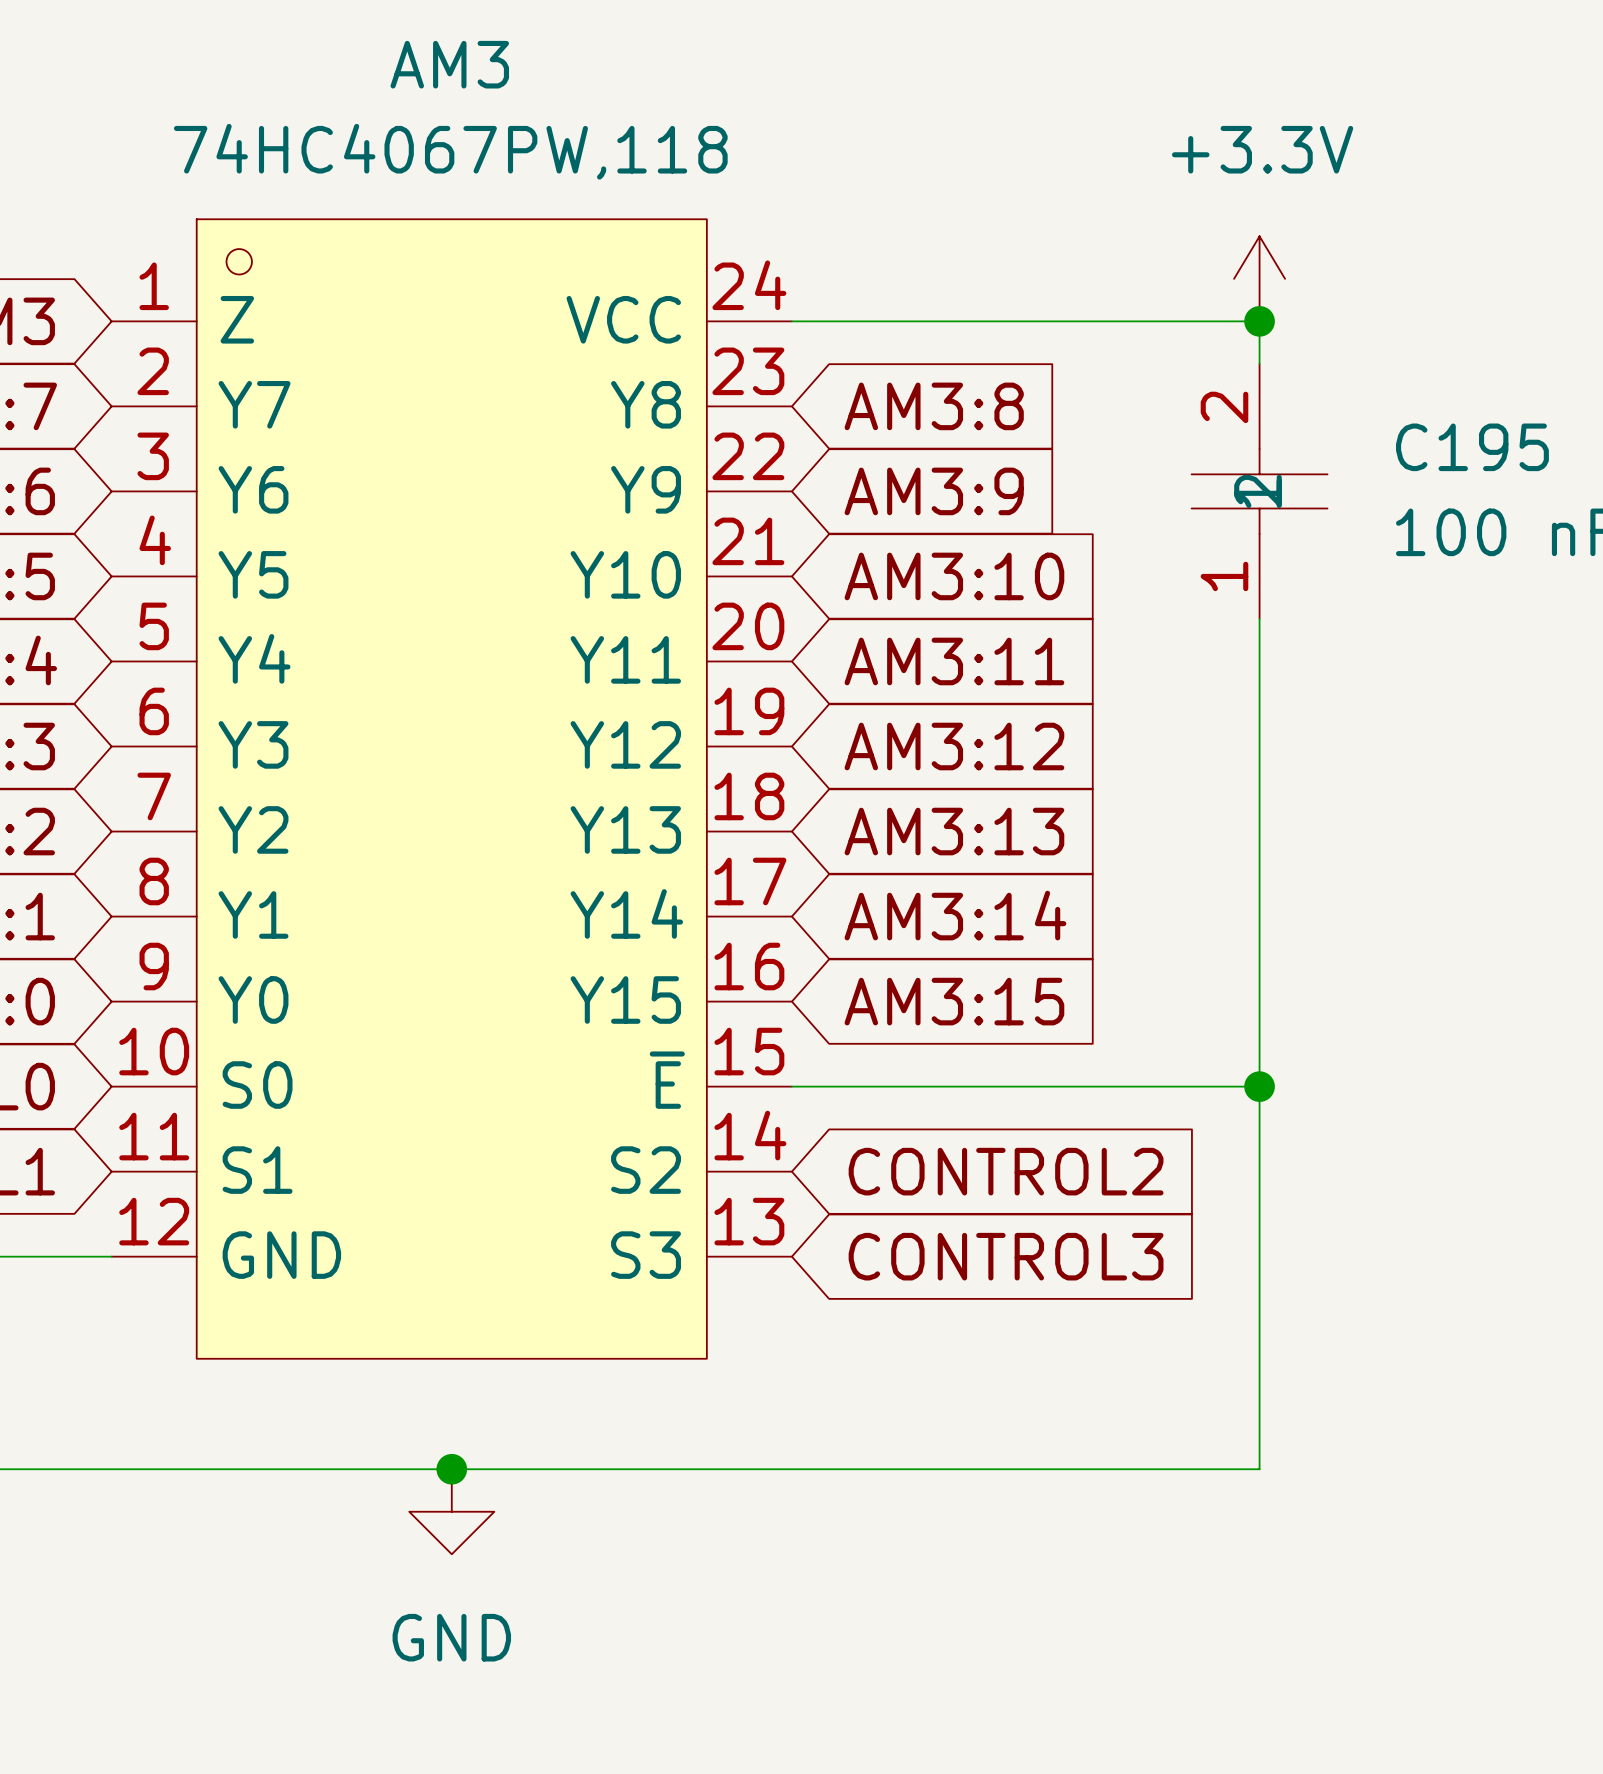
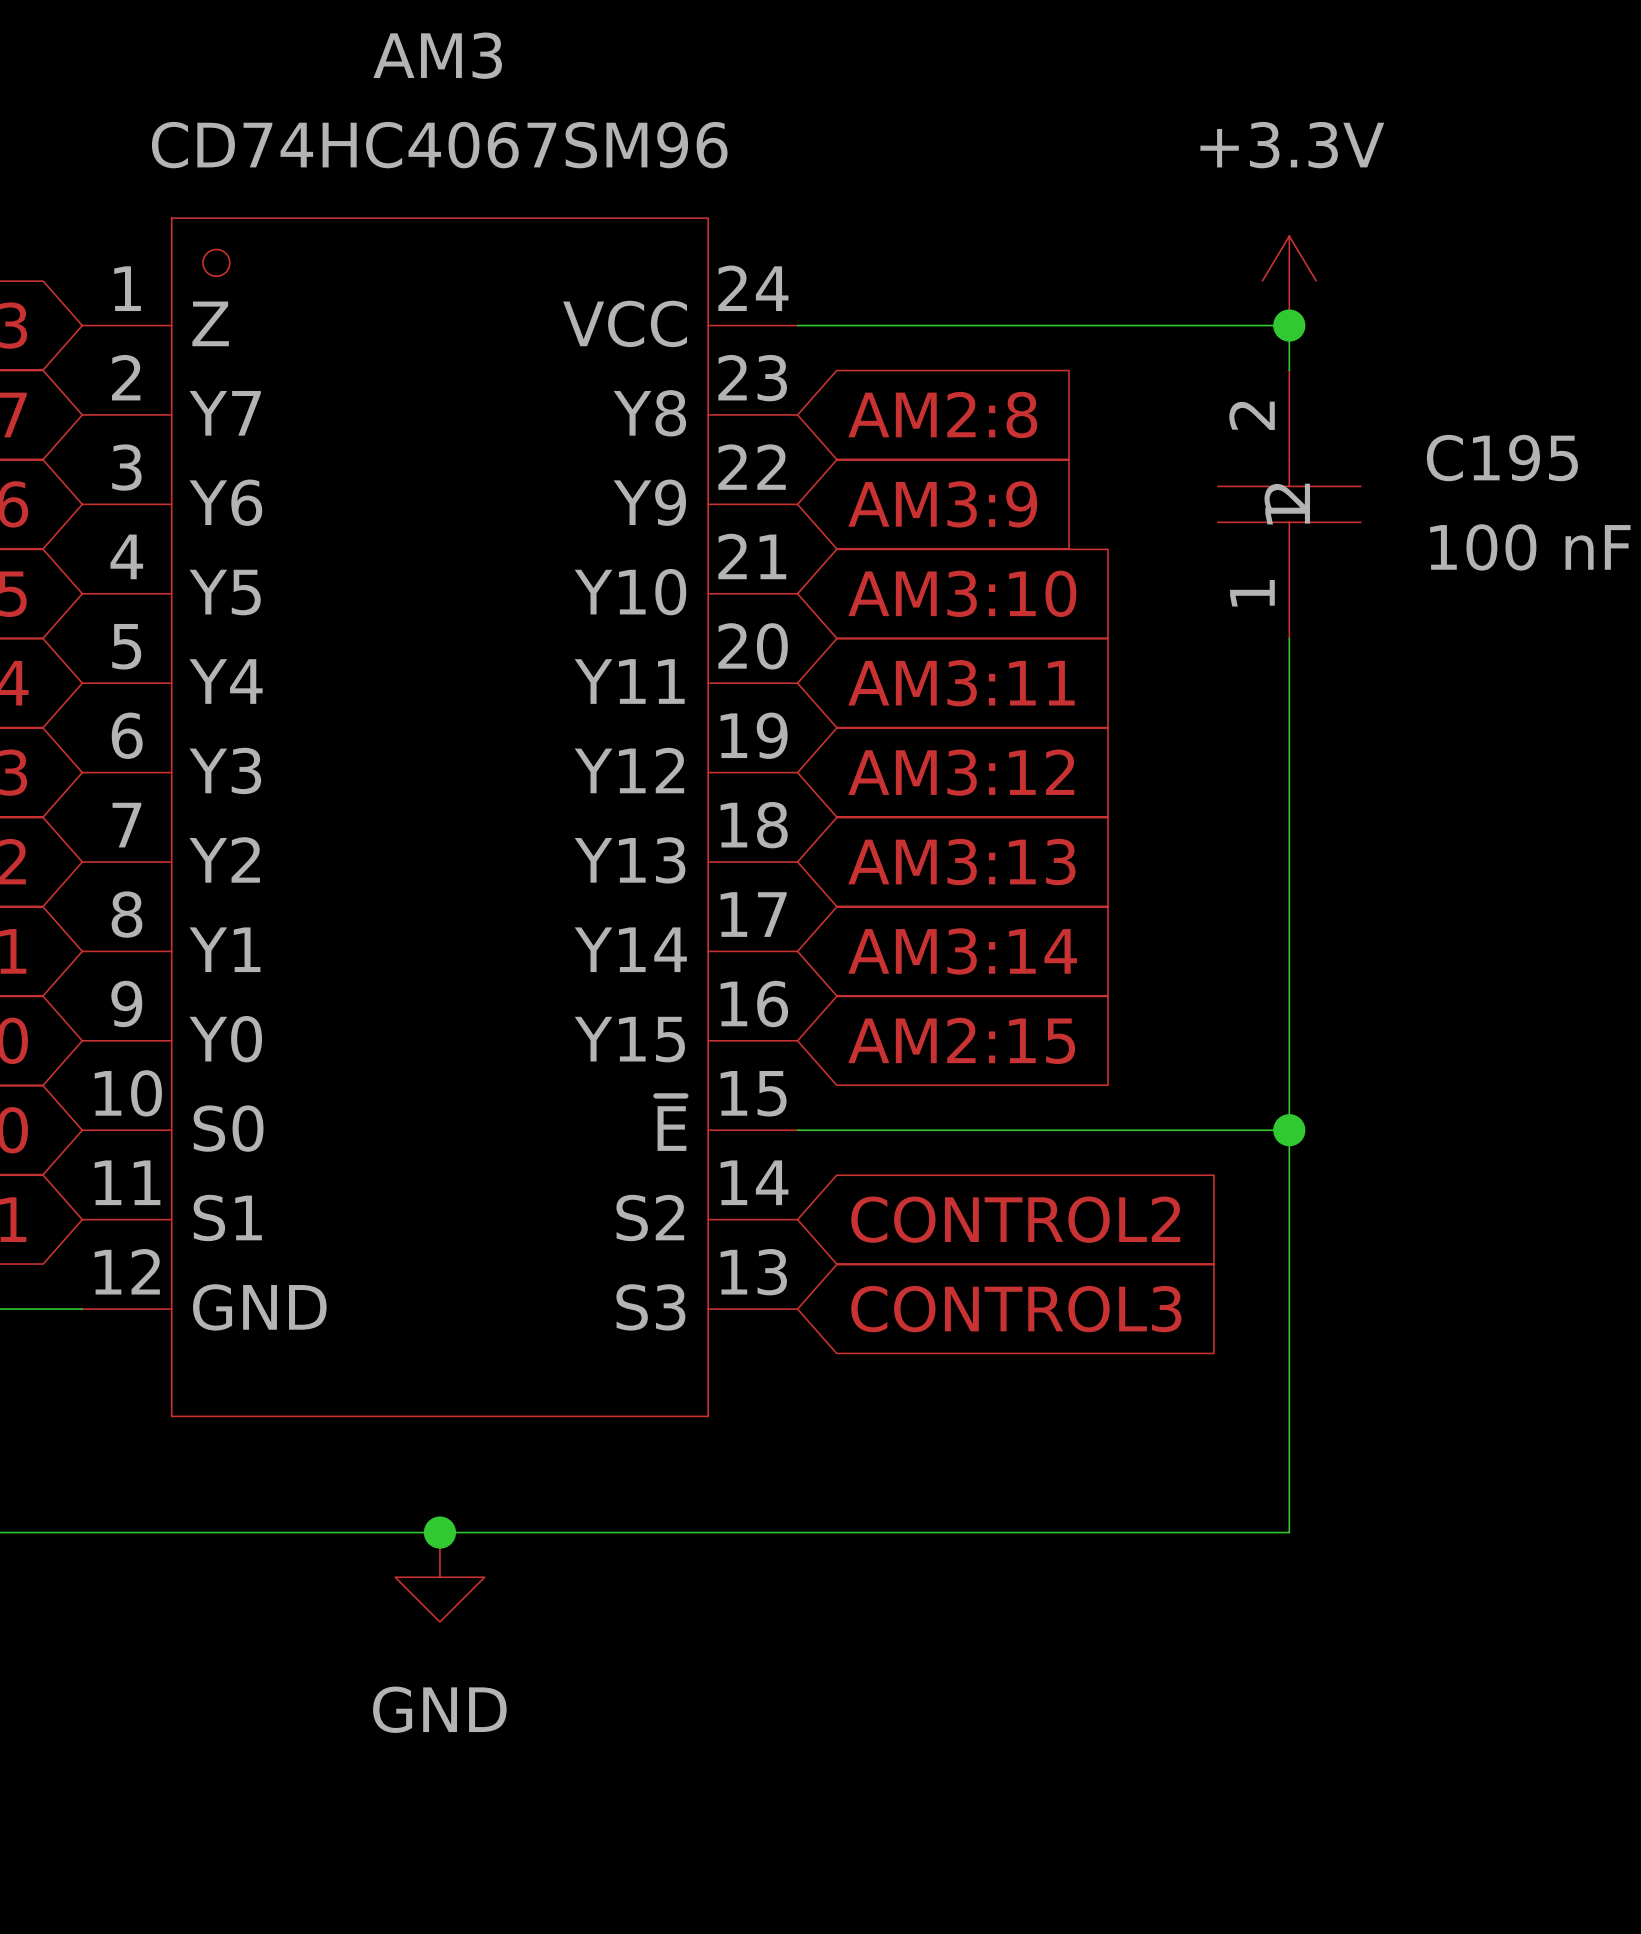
AM3 value: 74HC4067PW,118 (450, 151) -> CD74HC4067SM96 (439, 145)
global label: AM3:8 (934, 406) -> AM2:8 (942, 414)
global label: AM3:15 (954, 1001) -> AM2:15 (961, 1040)

